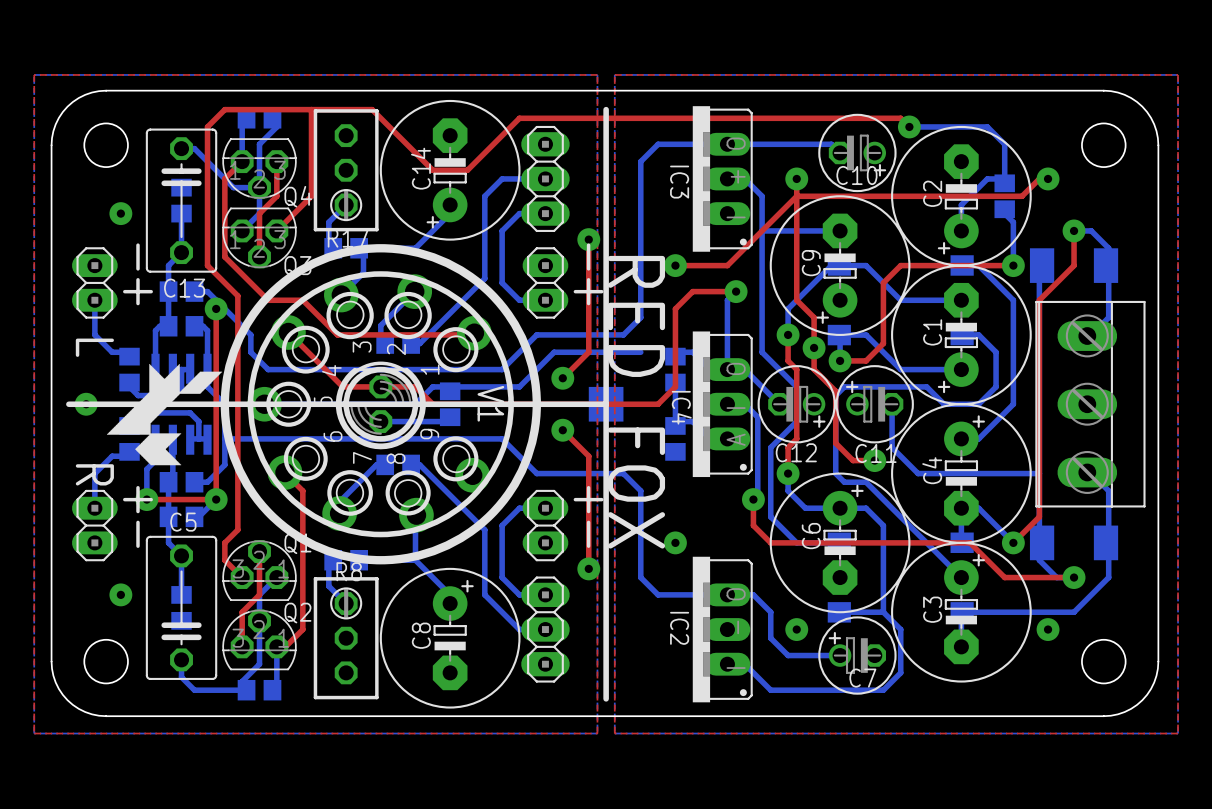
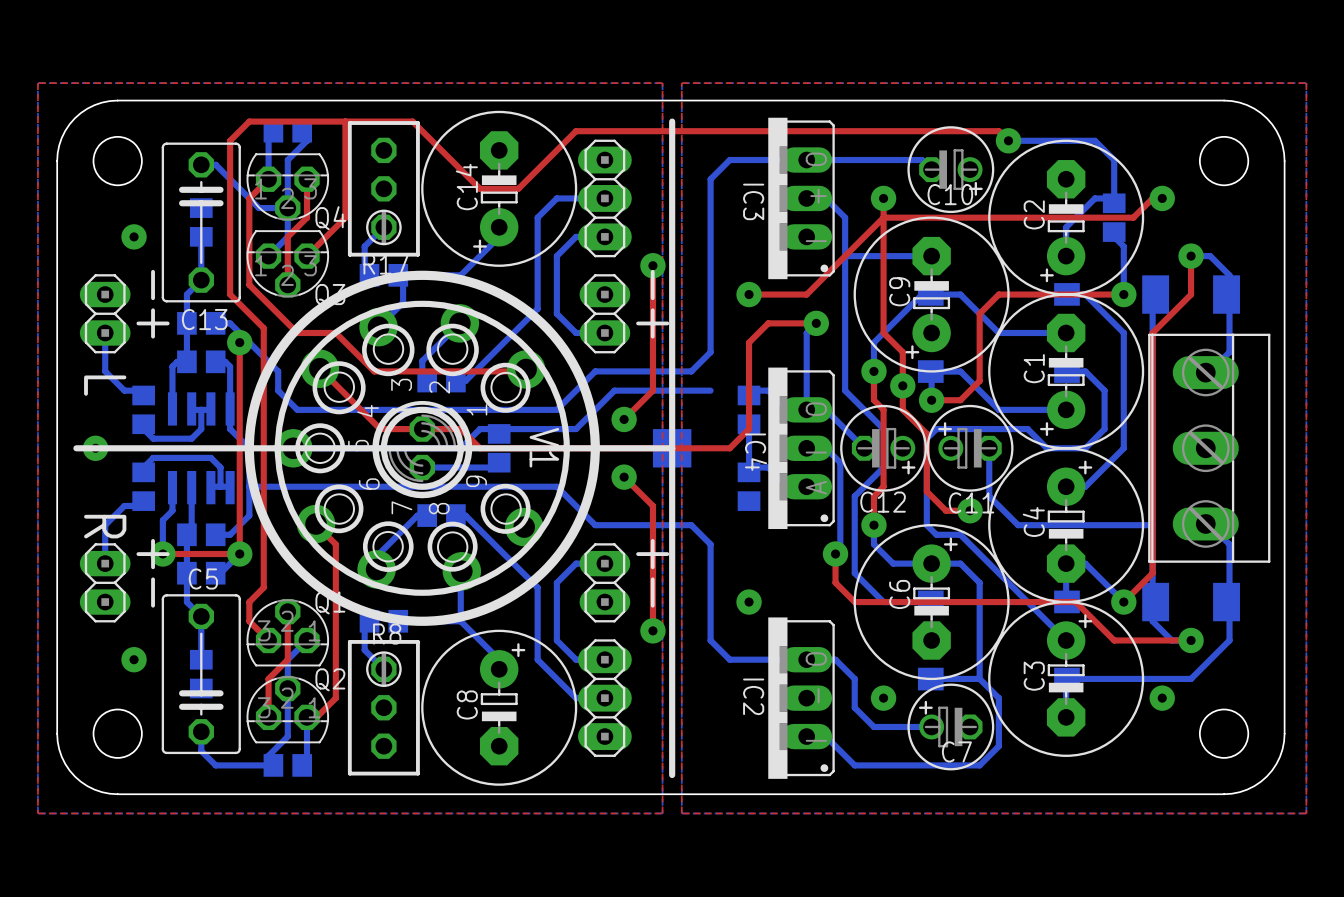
drawing: [106, 364, 223, 466] -> none
text: RED FOX (636, 402) -> none

